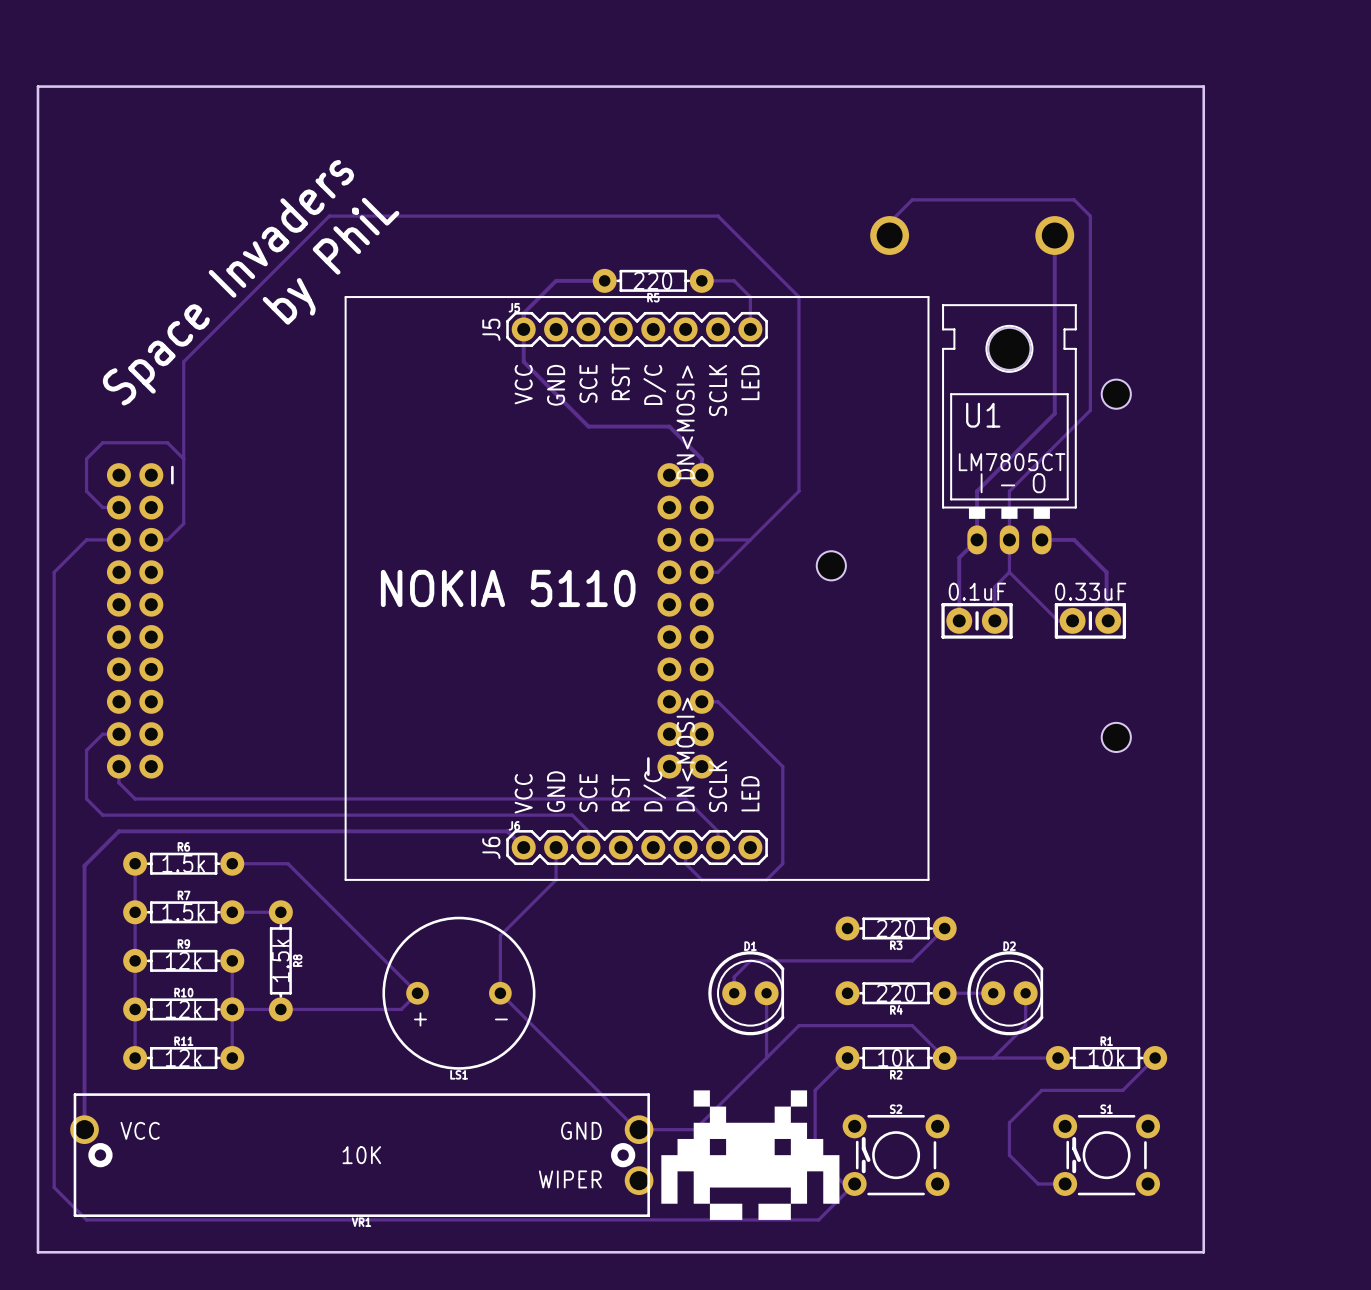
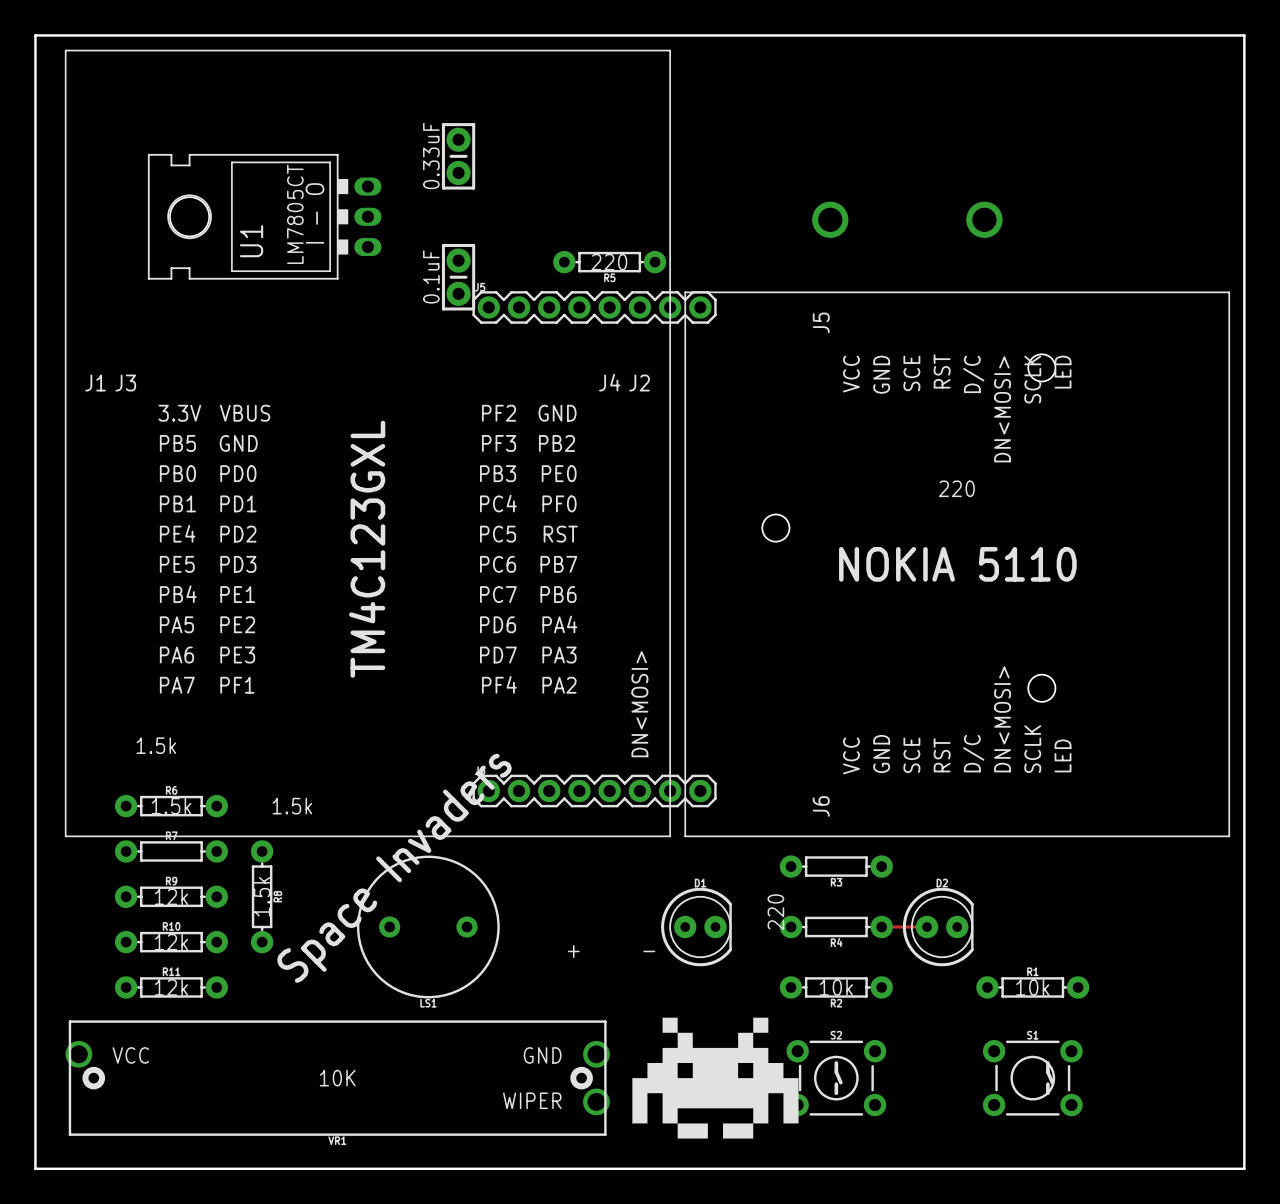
line: none -> (65, 50) (65, 836) (670, 836) (670, 50) (65, 50)
board edge: (37, 86) (1203, 86) (1203, 1252) -> (35, 80) (35, 35) (1244, 35) (1244, 1168) (1123, 1168)
text: none -> 0.33uF (431, 156)
part: none -> (458, 156)
text: none -> I - O (315, 213)
text: none -> LM7805CT (295, 214)
track: (889, 235) (889, 222) (912, 199) (1074, 199) (1090, 216) (1090, 410) (1009, 491) (1009, 572) -> none
track: (1054, 235) (1054, 413) (977, 491) (977, 539) (959, 557) (959, 620) -> none
text: by PhiL (331, 261) -> none
track: (604, 280) (556, 280) (523, 313) (523, 361) (588, 426) (669, 426) (701, 458) (701, 475) -> none
track: (701, 280) (734, 280) (750, 297) (750, 329) -> none
text: Space Invaders (228, 282) -> none
text: none -> 0.1uF (431, 276)
line: (345, 297) (928, 297) (928, 879) (345, 879) (345, 297) -> none
part: none -> (458, 277)
line: none -> (685, 292) (1229, 292) (1229, 836) (685, 836) (685, 292)
text: J5 (491, 329) -> none
text: none -> J5 (821, 322)
text: RST (620, 381) -> none
text: LED (750, 382) -> none
text: SCE (588, 383) -> none
text: VCC (523, 384) -> none
text: D/C (654, 384) -> none
text rotation: 0° (556, 385) -> 90° clockwise (557, 413)
text position: GND (556, 385) -> GND (557, 413)
text: SCLK (718, 390) -> none
text: none -> RST (942, 371)
text: none -> LED (1063, 372)
text: none -> VCC (851, 374)
text: none -> SCE (911, 373)
text: none -> GND (881, 374)
text: none -> D/C (973, 374)
text: none -> SCLK (1032, 379)
text: none -> J4 (609, 382)
text: none -> J1 (95, 383)
text: none -> J3 (125, 383)
text: none -> J2 (639, 383)
text: DN<MOSI> (685, 422) -> none
U1 rotation: 0° (1009, 429) -> 90° counterclockwise (264, 216)
U1 position: (1009, 429) -> (264, 216)
text: none -> DN<MOSI> (1002, 409)
text: none -> 3.3V (179, 413)
text: none -> VBUS (245, 413)
text: none -> PF2 (499, 413)
track: (183, 458) (167, 442) (102, 442) (86, 458) (86, 491) (102, 507) (118, 507) -> none
text: LM7805CT (1012, 462) -> none
text: none -> PB5 (177, 443)
text: none -> GND (238, 443)
text: none -> PF3 (499, 443)
text: none -> PB2 (557, 443)
text: I - O (1013, 483) -> none
text: none -> PB0 (177, 473)
text: none -> PD0 (238, 473)
text: none -> PB3 (498, 473)
text: none -> PE0 (559, 473)
text: none -> 220 (956, 488)
track: (118, 539) (86, 539) (54, 572) (54, 1187) (86, 1219) (818, 1219) (854, 1183) (843, 1183) (815, 1155) (815, 1090) (847, 1058) -> none
track: (151, 539) (167, 539) (183, 523) (183, 361) (329, 216) (718, 216) (798, 297) (798, 491) (718, 572) (701, 572) -> none
text: none -> PB1 (177, 503)
text: none -> PD1 (238, 503)
text: none -> PC4 (498, 503)
text: none -> PF0 (559, 503)
track: (701, 539) (750, 539) -> none
track: (1041, 539) (1074, 539) (1106, 572) (1106, 619) (1108, 620) -> none
text: none -> PE4 (177, 533)
text: none -> PD2 (238, 534)
text: none -> PC5 (498, 534)
text: none -> RST (560, 534)
track: (1009, 572) (1058, 620) (1072, 620) -> none
track: (1009, 572) (994, 586) (994, 620) -> none
text: none -> TM4C123GXL (367, 549)
text: NOKIA 5110 (508, 588) -> none
text: 0.1uF (977, 591) -> none
text: 0.33uF (1090, 591) -> none
text: none -> PE5 (177, 564)
text: none -> PD3 (238, 564)
text: none -> PC6 (498, 564)
text: none -> PB7 (558, 564)
text: none -> NOKIA 5110 (957, 564)
part: (140, 620) -> none
part: (680, 620) -> none
part: (977, 620) -> none
part: (1090, 620) -> none
text: none -> PB4 (178, 594)
text: none -> PE1 (237, 594)
text: none -> PC7 (498, 594)
text: none -> PB6 (558, 594)
text: none -> PA5 (176, 624)
text: none -> PE2 (237, 624)
text: none -> PD6 (498, 624)
text: none -> PA4 (559, 624)
text: none -> PA6 (176, 655)
text: none -> PE3 (237, 655)
text: none -> PD7 (498, 655)
text: none -> PA3 (559, 655)
track: (701, 701) (718, 701) (782, 766) (782, 863) (766, 879) (701, 879) (685, 863) (685, 847) -> none
text: none -> PF4 (499, 684)
track: (118, 734) (102, 734) (86, 750) (86, 798) (102, 815) (572, 815) (588, 831) (588, 847) -> none
text: none -> PA7 (177, 685)
text: none -> PF1 (237, 685)
text: none -> PA2 (559, 685)
track: (118, 766) (118, 782) (135, 798) (685, 798) (718, 831) (718, 847) -> none
text: none -> DN<MOSI> (1002, 719)
text: SCLK (718, 786) -> none
text: GND (556, 791) -> none
text: D/C (654, 791) -> none
text: VCC (523, 793) -> none
text: SCE (588, 793) -> none
text: RST (620, 793) -> none
text: LED (750, 793) -> none
text: none -> 1.5k (156, 745)
text: none -> SCLK (1032, 749)
text: none -> GND (881, 753)
text: none -> D/C (973, 753)
text: none -> VCC (851, 755)
text: none -> SCE (911, 755)
text: none -> RST (942, 755)
text: none -> LED (1063, 755)
text: J6 (491, 847) -> none
track: (523, 847) (507, 831) (118, 831) (84, 865) (84, 1129) -> none
track: (556, 847) (556, 879) (500, 935) (500, 993) (636, 1129) (694, 1129) (798, 1025) (912, 1025) (944, 1058) (1058, 1058) -> none
track: (135, 863) (135, 1058) -> none
track: (232, 863) (287, 863) (417, 993) (401, 1009) (232, 1009) -> none
text: none -> 1.5k (292, 806)
text: none -> J6 (821, 806)
text: 1.5k (183, 912) -> none
track: (232, 912) (280, 912) -> none
text: 220 (895, 928) -> none
track: (944, 928) (912, 960) (750, 960) (734, 977) (734, 993) -> none
text: none -> Space Invaders (394, 868)
track: (232, 960) (232, 1058) -> none
text: none -> 220 (775, 912)
track: (766, 993) (766, 1058) -> none
text: 220 (895, 993) -> none
track: (1025, 993) (1025, 1025) (993, 1058) -> none
text position: + (420, 1019) -> + (573, 951)
text position: - (501, 1019) -> - (649, 951)
track: (1155, 1058) (1122, 1090) (1041, 1090) (1009, 1122) (1009, 1155) (1038, 1183) (1065, 1183) -> none
drawing: [661, 1090, 727, 1204] -> none
drawing: none -> [662, 1017, 693, 1048]
drawing: [774, 1090, 808, 1123] -> none
drawing: none -> [738, 1017, 799, 1124]
drawing: none -> [662, 1063, 678, 1079]
drawing: [726, 1138, 743, 1156] -> none
drawing: none -> [723, 1063, 739, 1079]
drawing: [790, 1138, 808, 1156] -> none
line: (863, 1138) (863, 1148) (868, 1160) -> (836, 1063) (836, 1072) (840, 1082)
line: (1074, 1138) (1074, 1148) (1079, 1160) -> (1047, 1063) (1047, 1072) (1052, 1082)
line: (863, 1161) (863, 1171) -> (836, 1084) (836, 1093)
line: (1074, 1161) (1074, 1171) -> (1047, 1084) (1047, 1093)
drawing: none -> [632, 1093, 648, 1124]
drawing: [693, 1171, 727, 1220] -> none
drawing: none -> [738, 1093, 769, 1139]
drawing: [823, 1171, 840, 1204] -> none
drawing: none -> [662, 1108, 678, 1124]
drawing: [790, 1187, 808, 1204] -> none
drawing: none -> [692, 1123, 708, 1139]
drawing: [758, 1203, 775, 1220] -> none

